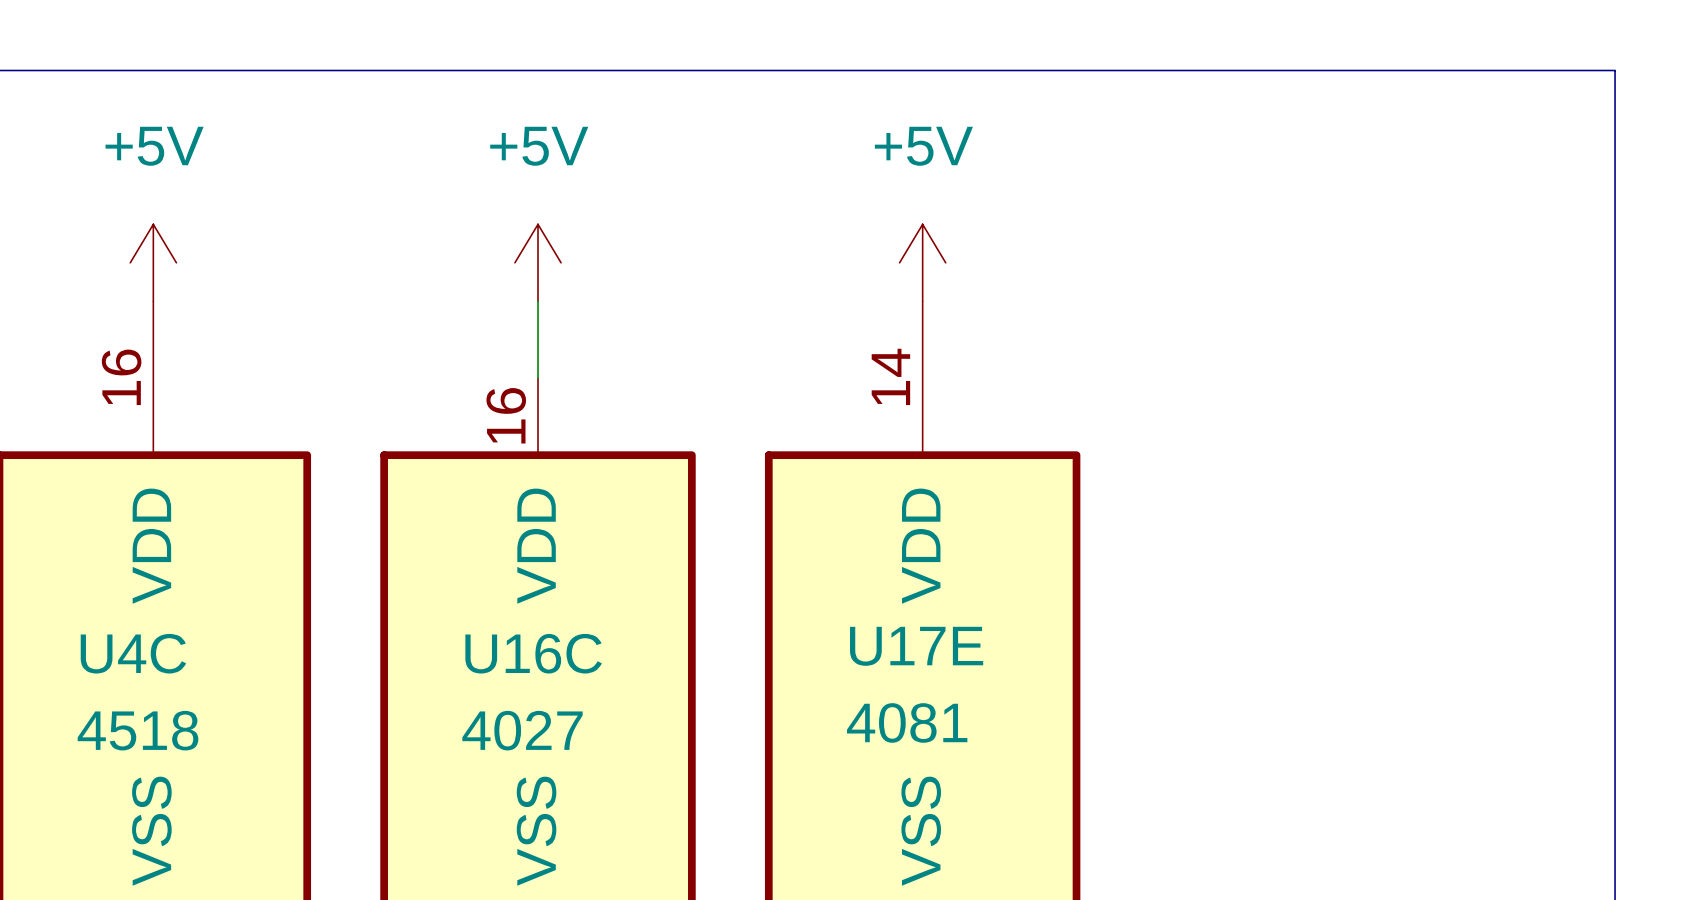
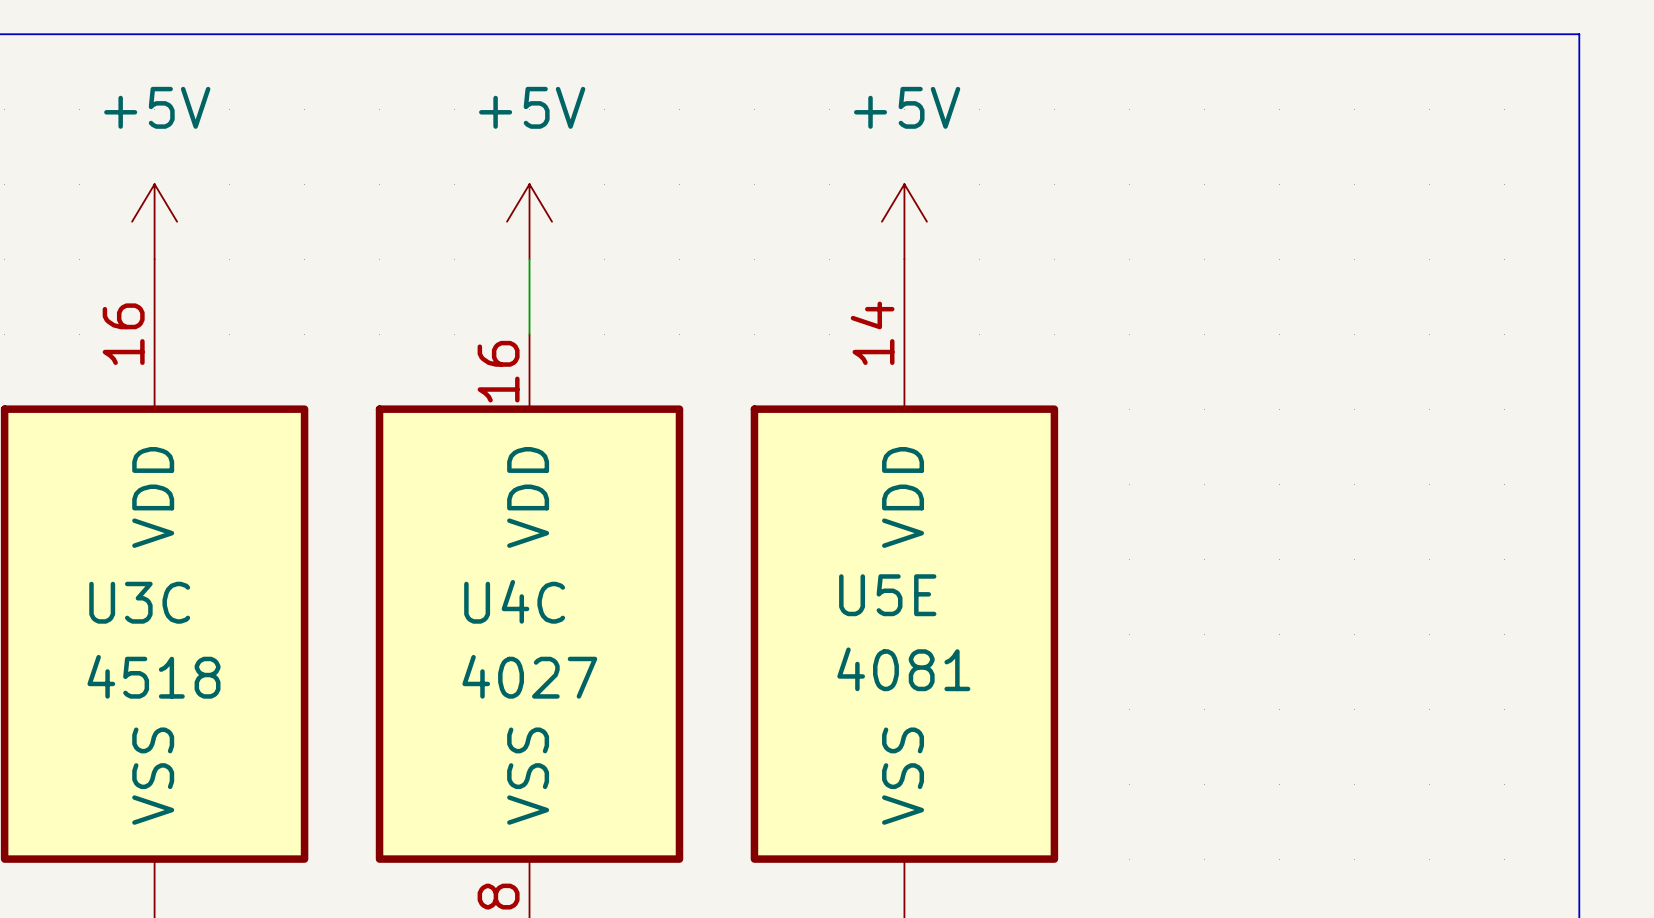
U17E name: U17E (916, 646) -> U5E (887, 595)
U4C name: U4C (133, 653) -> U3C (139, 602)
U16C name: U16C (533, 653) -> U4C (514, 601)

